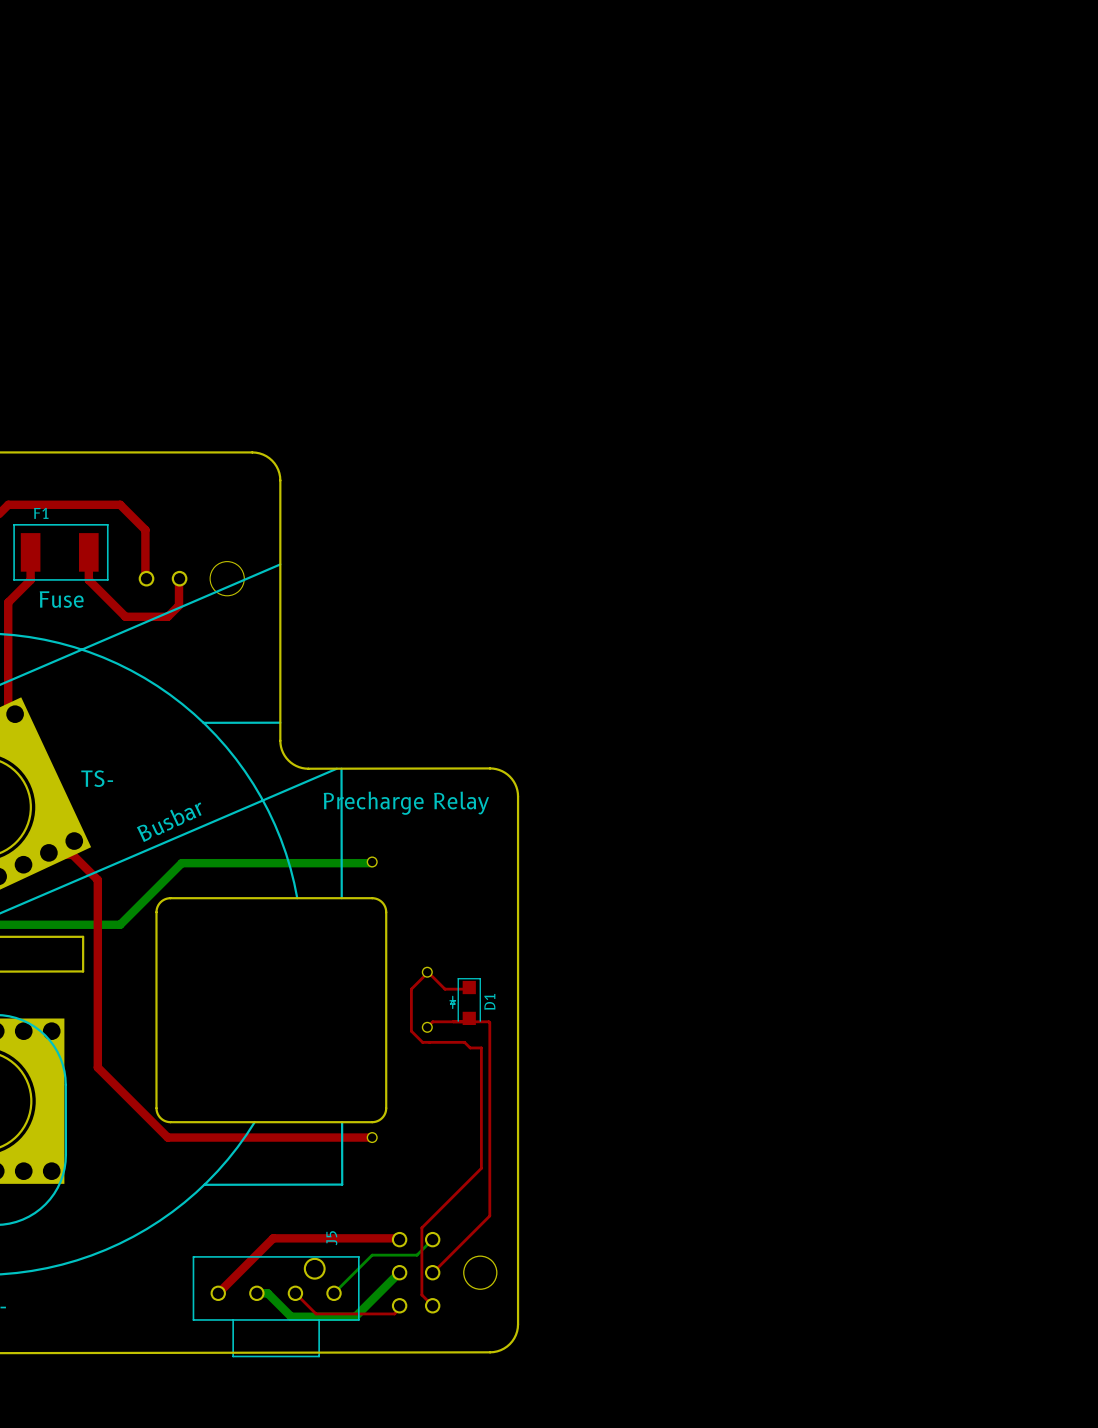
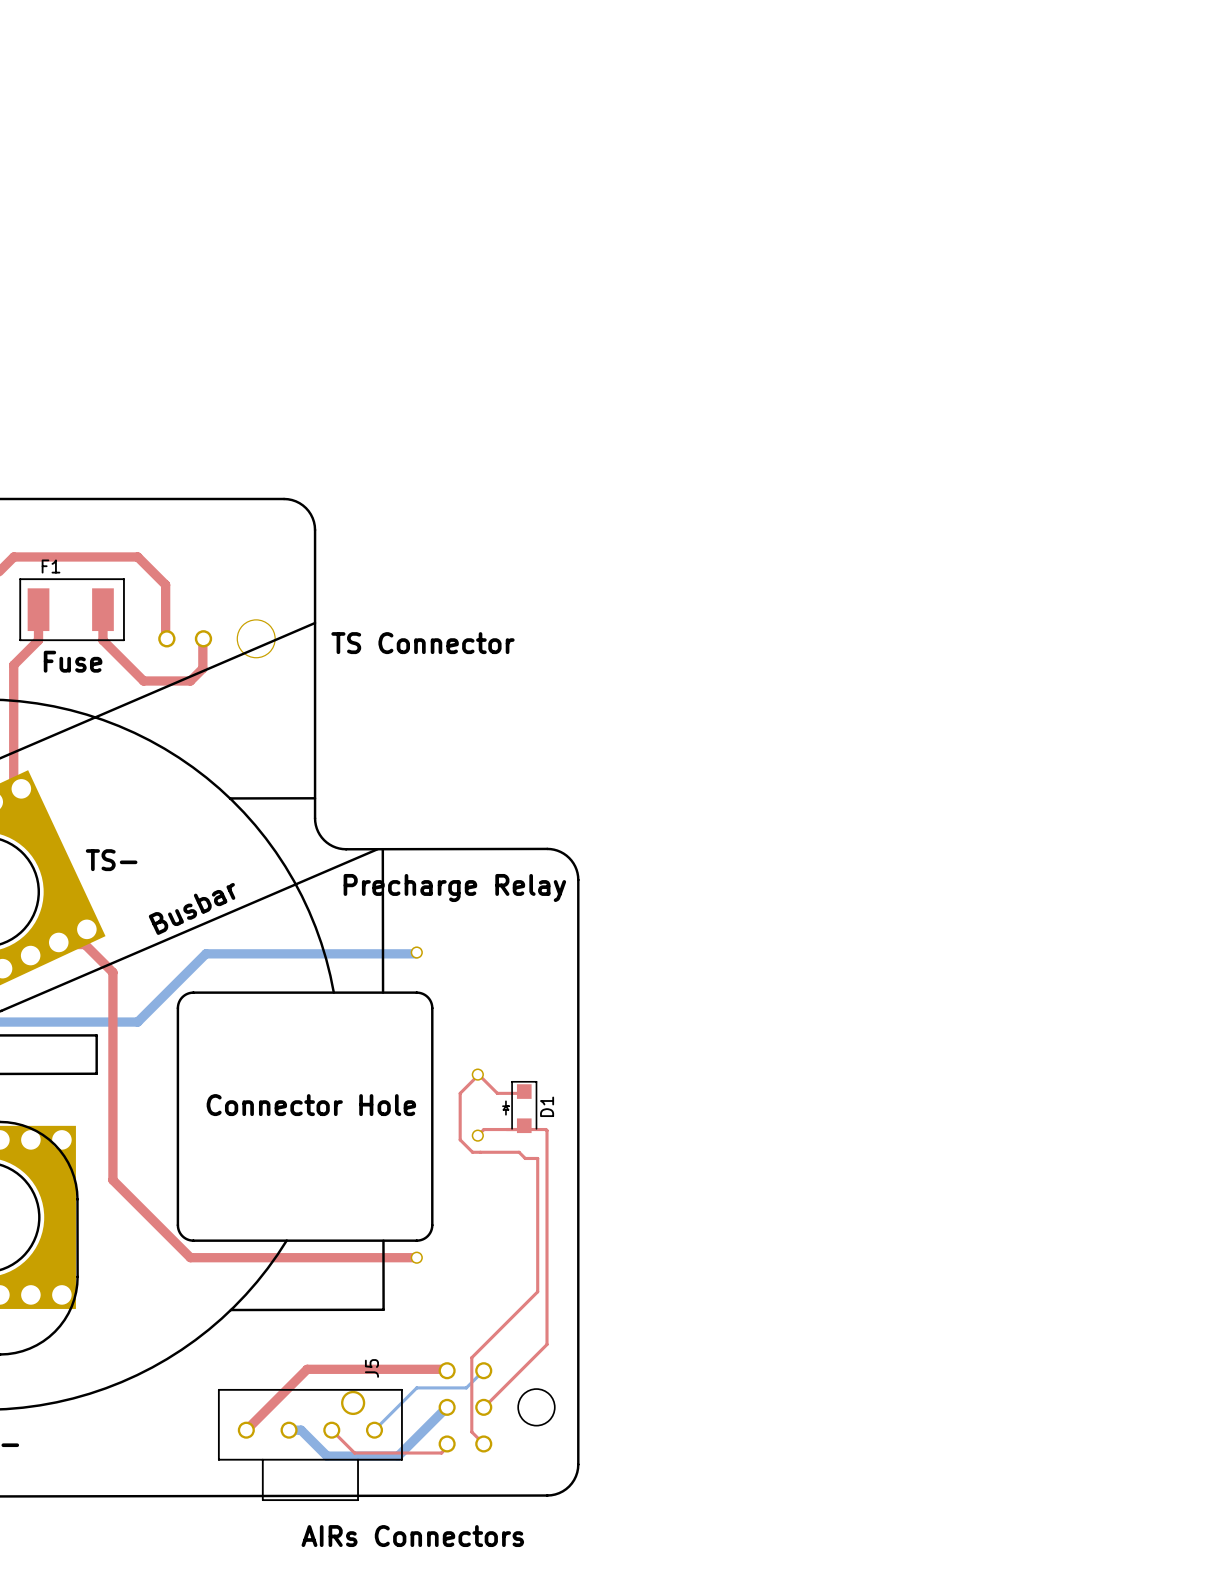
text: none -> TS Connector (422, 643)
text: none -> Connector Hole (311, 1105)
text: none -> AIRs Connectors (412, 1536)

